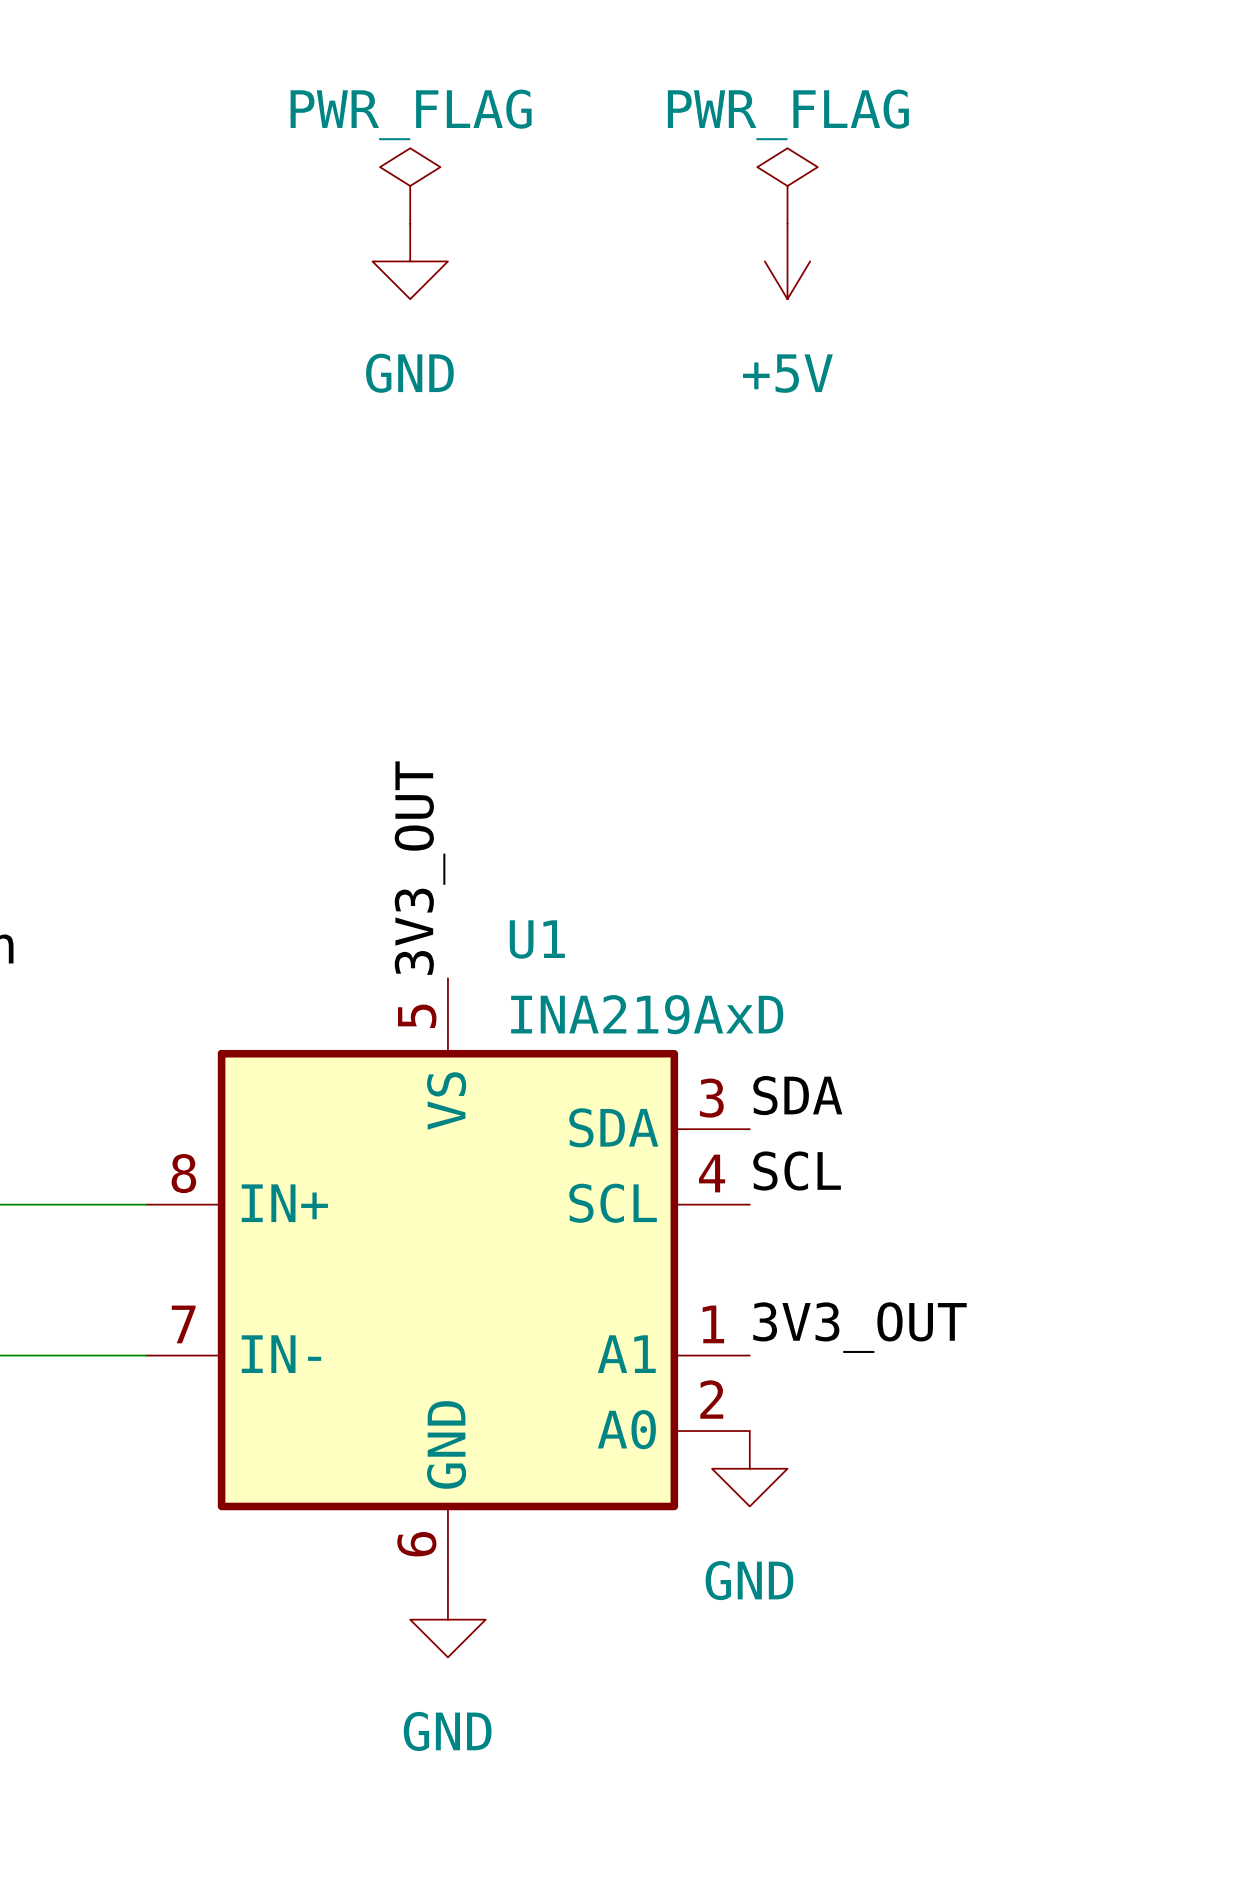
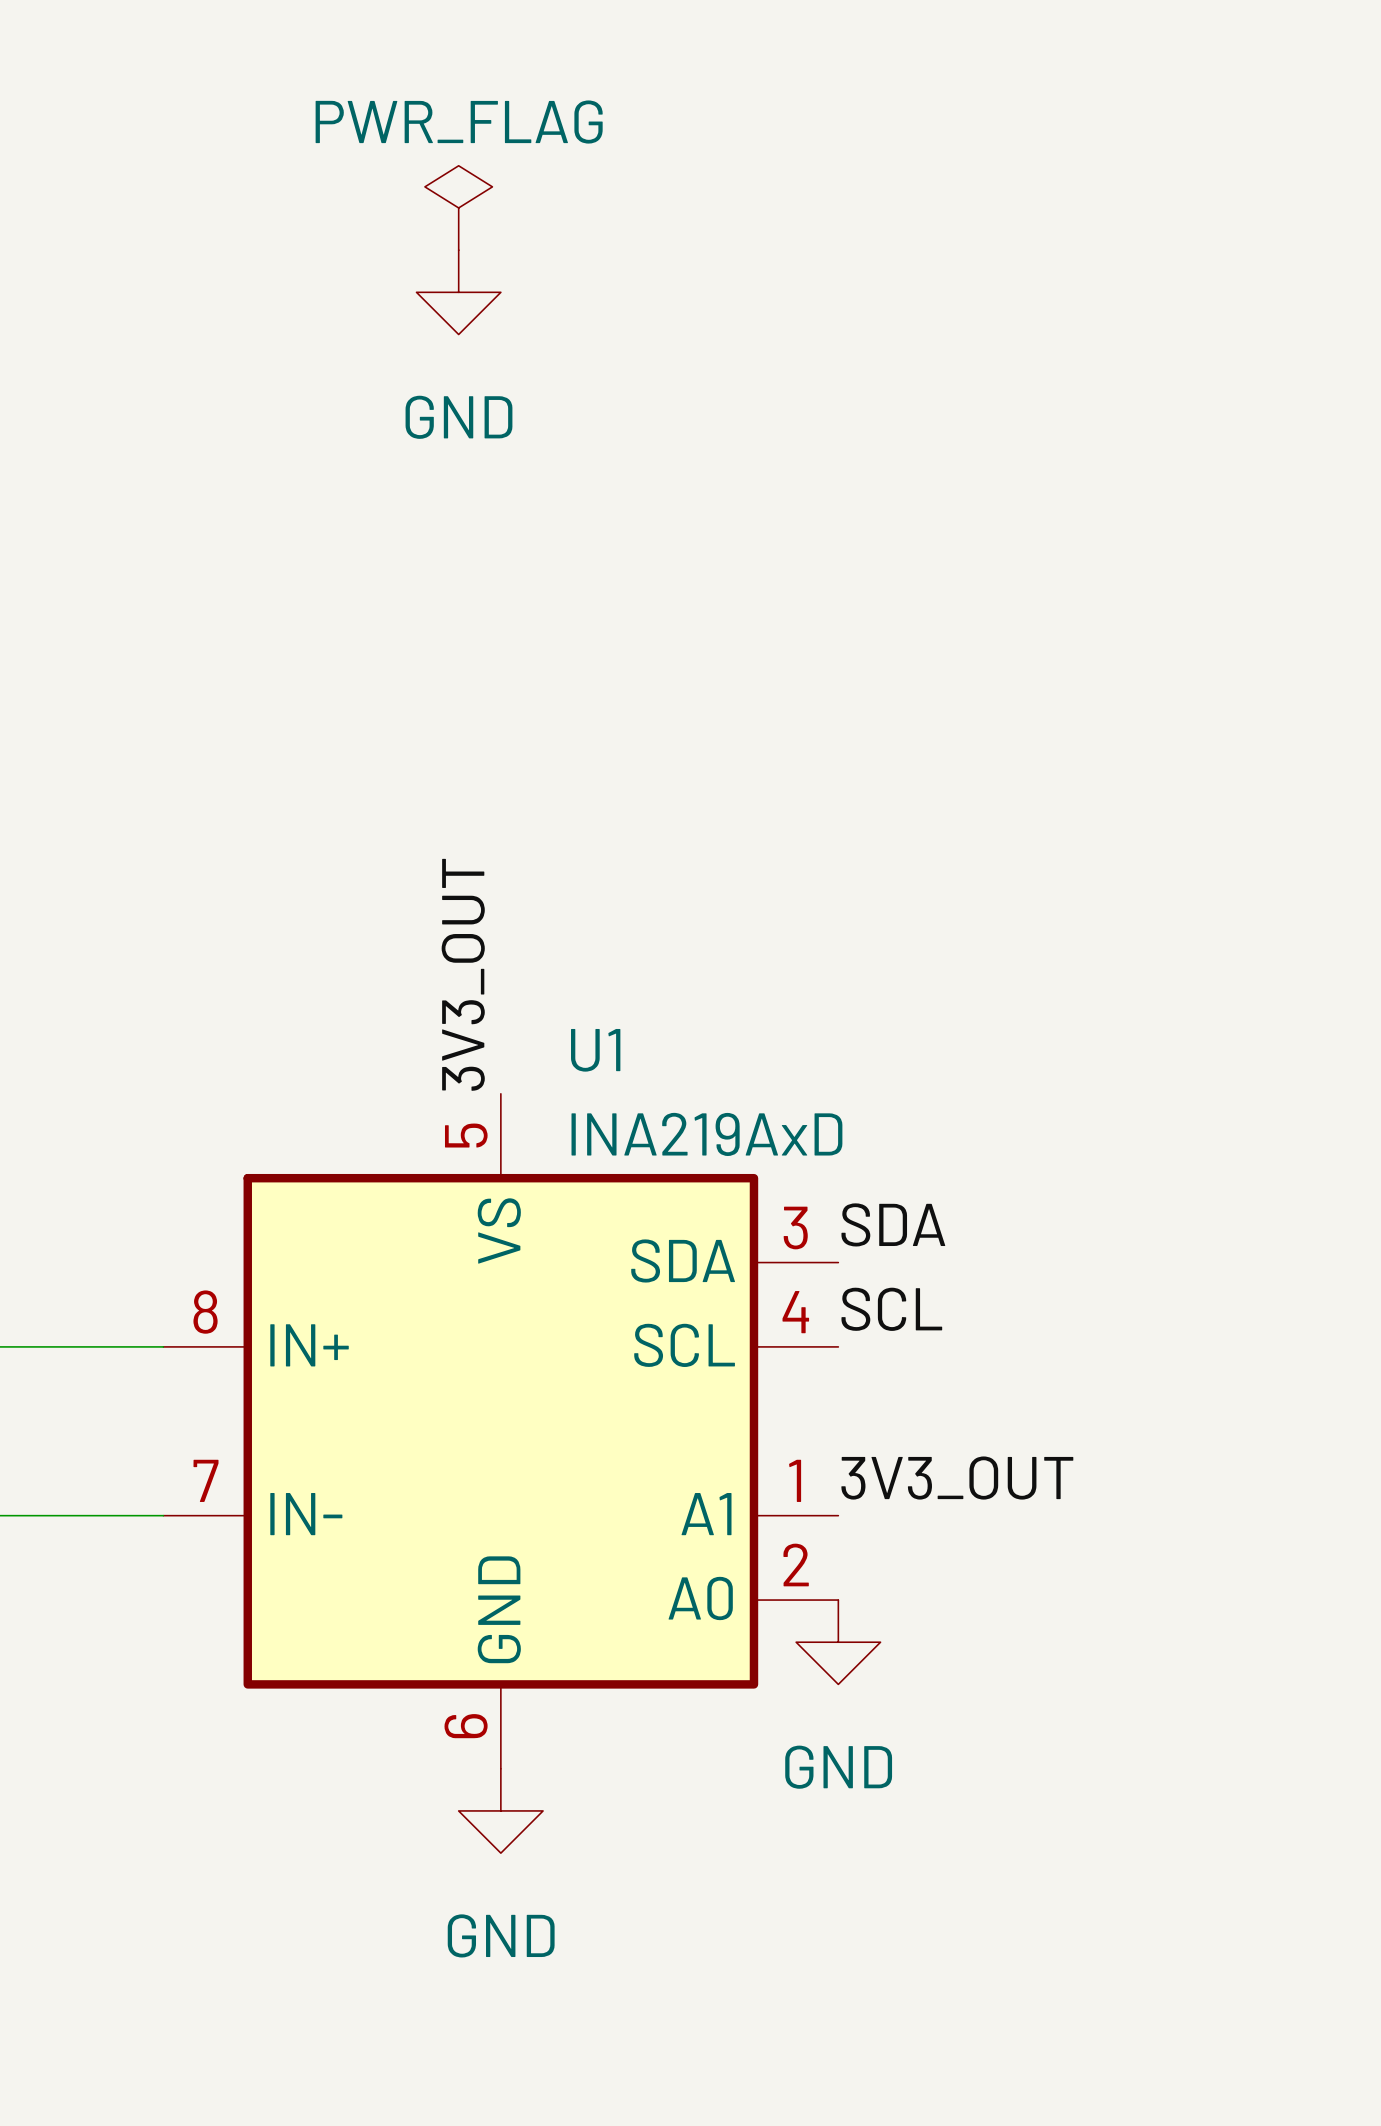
power symbol: PWR_FLAG (787, 185) -> none
power symbol: +5V (787, 261) -> none

